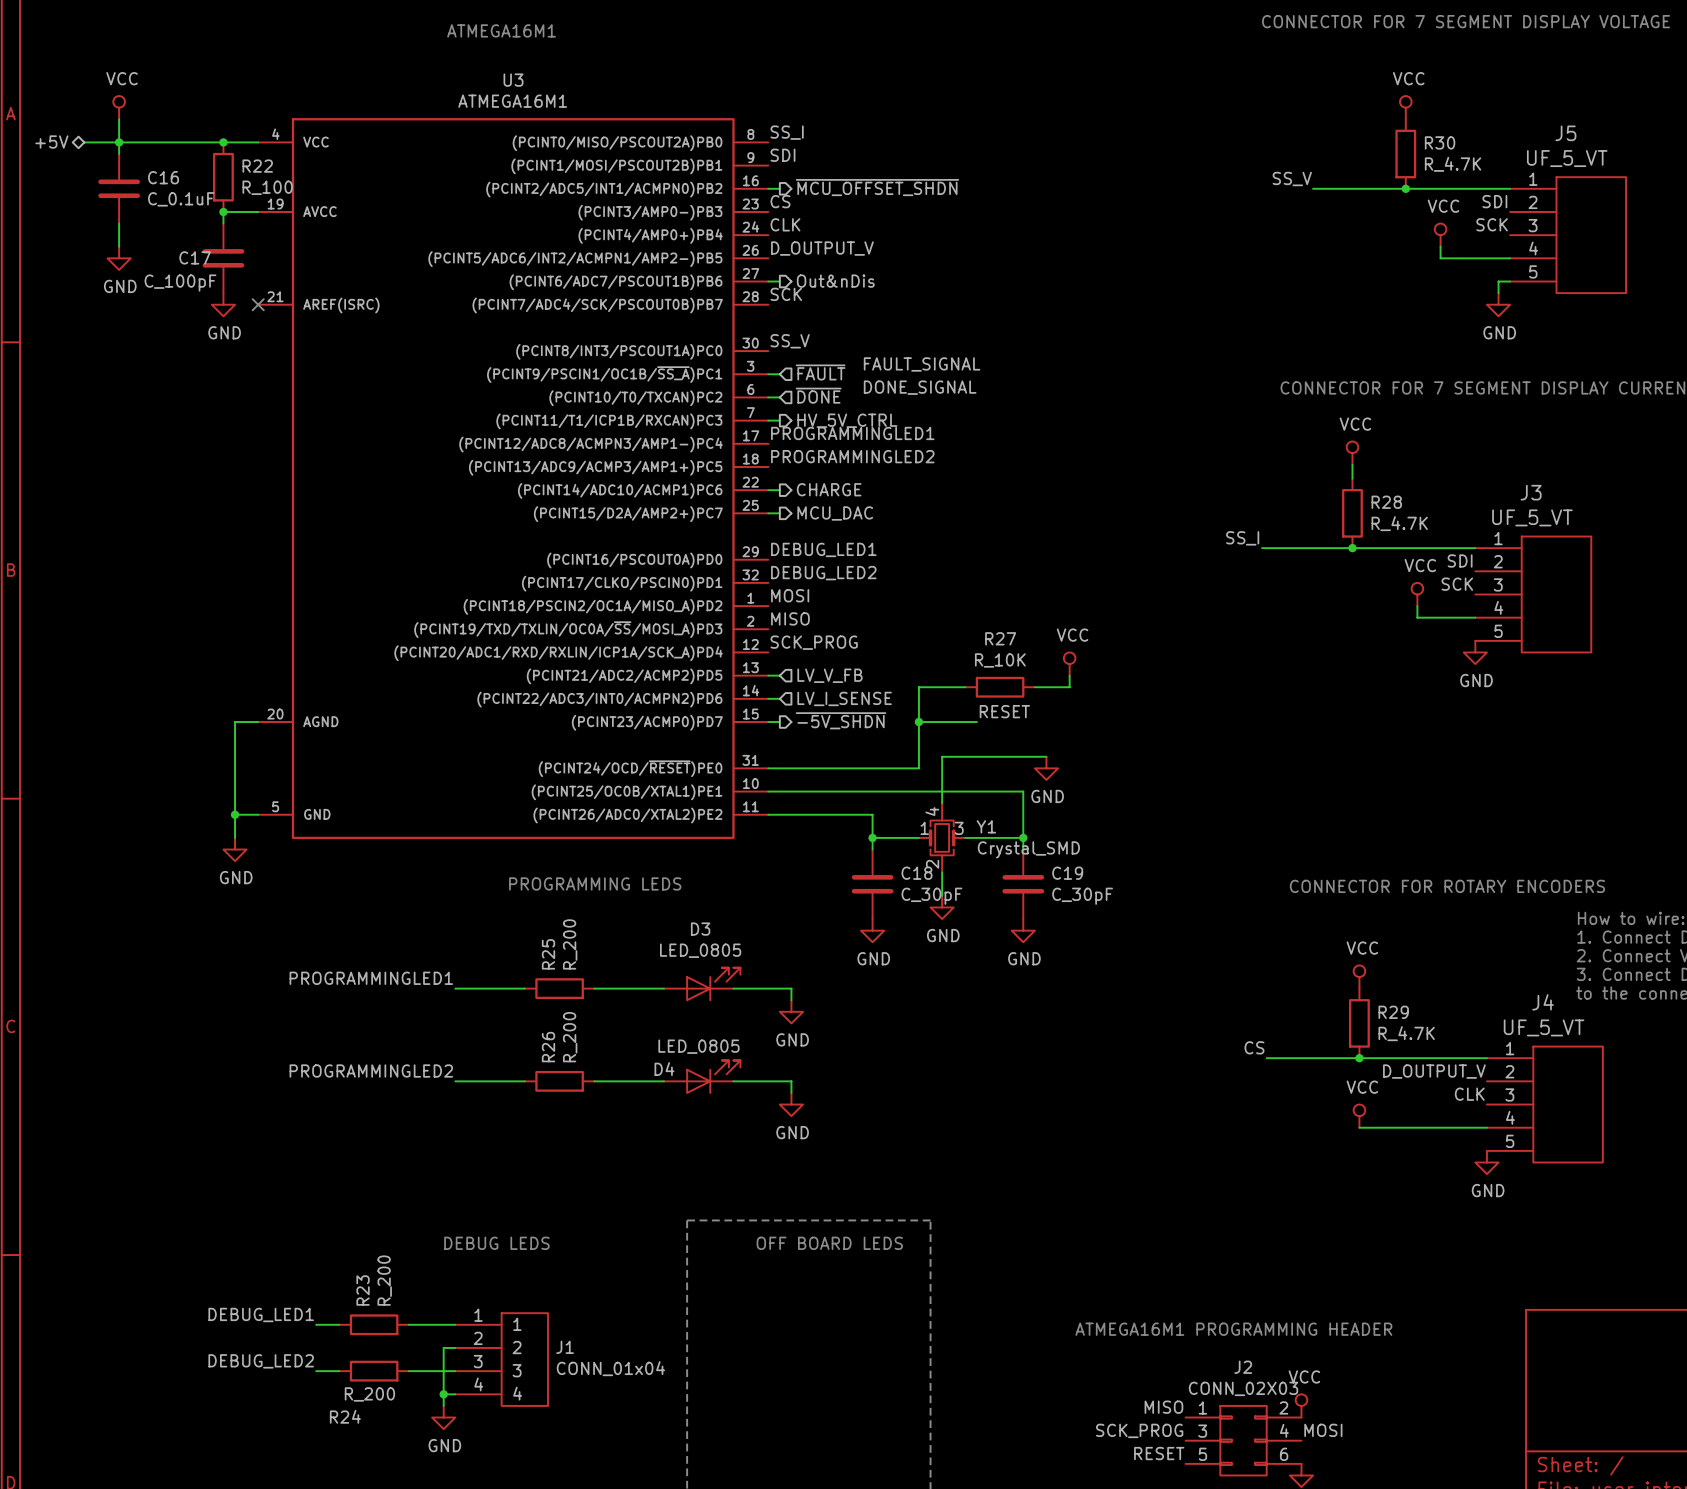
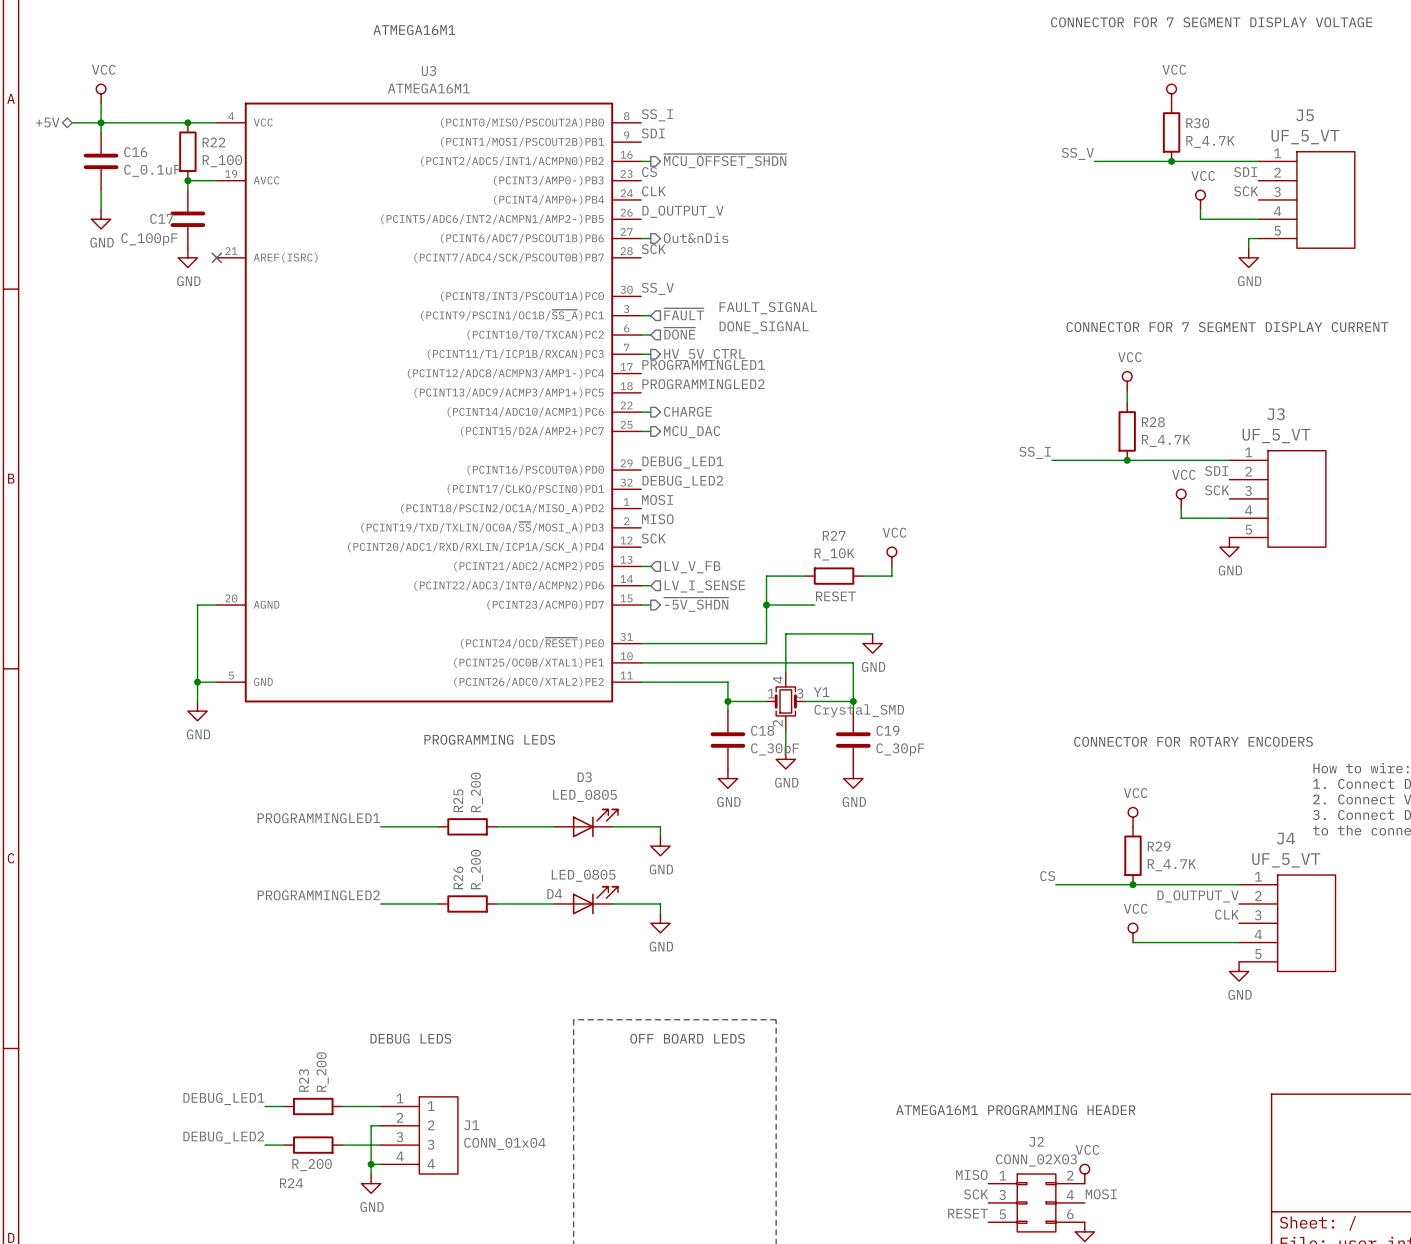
label: SCK_PROG (814, 642) -> SCK (653, 538)
label: SCK_PROG (1139, 1430) -> SCK (976, 1194)

